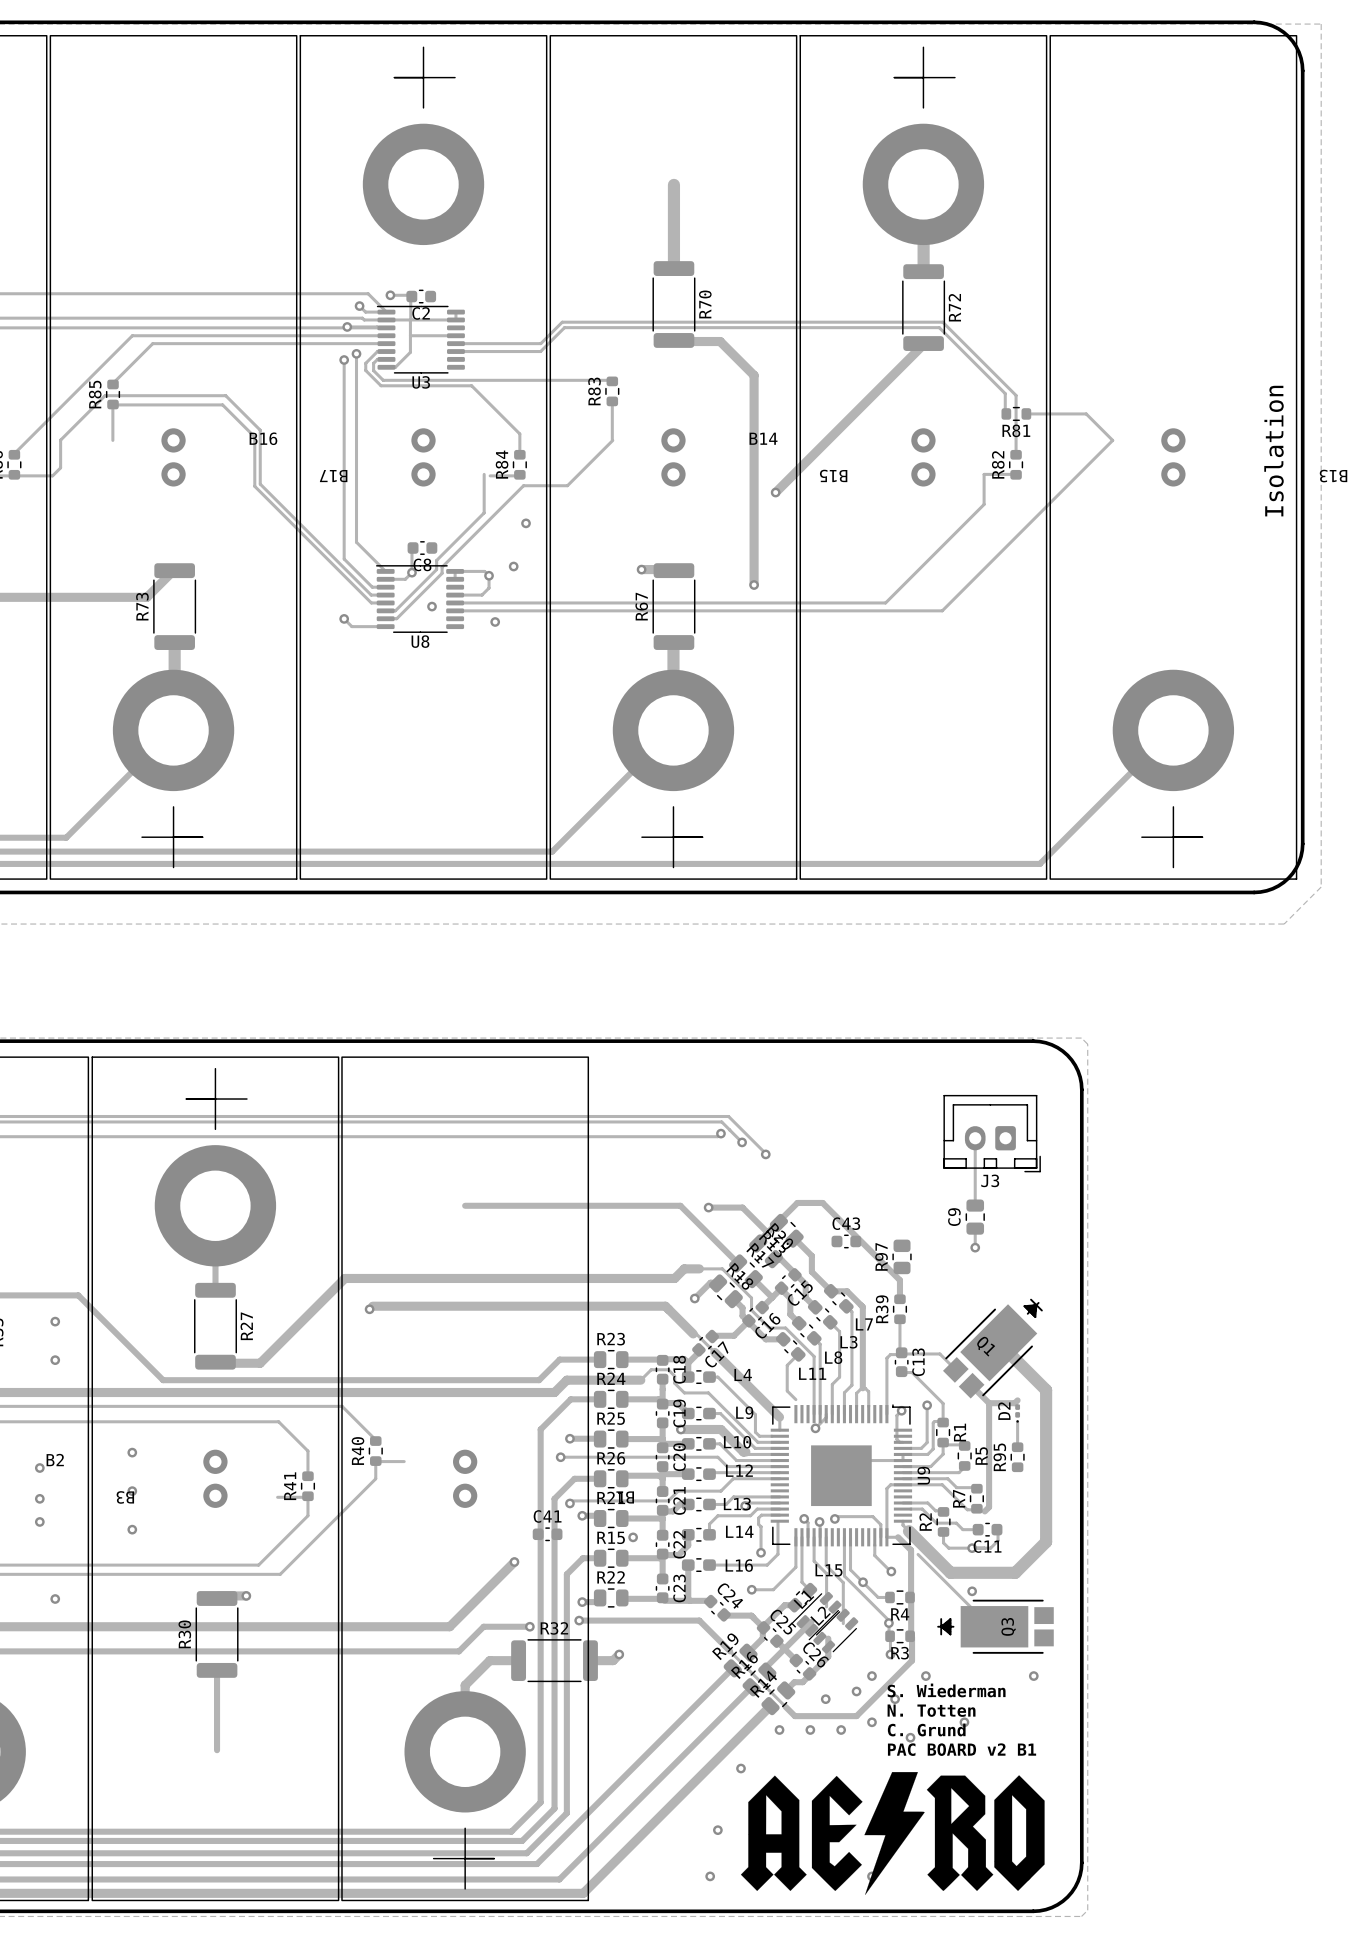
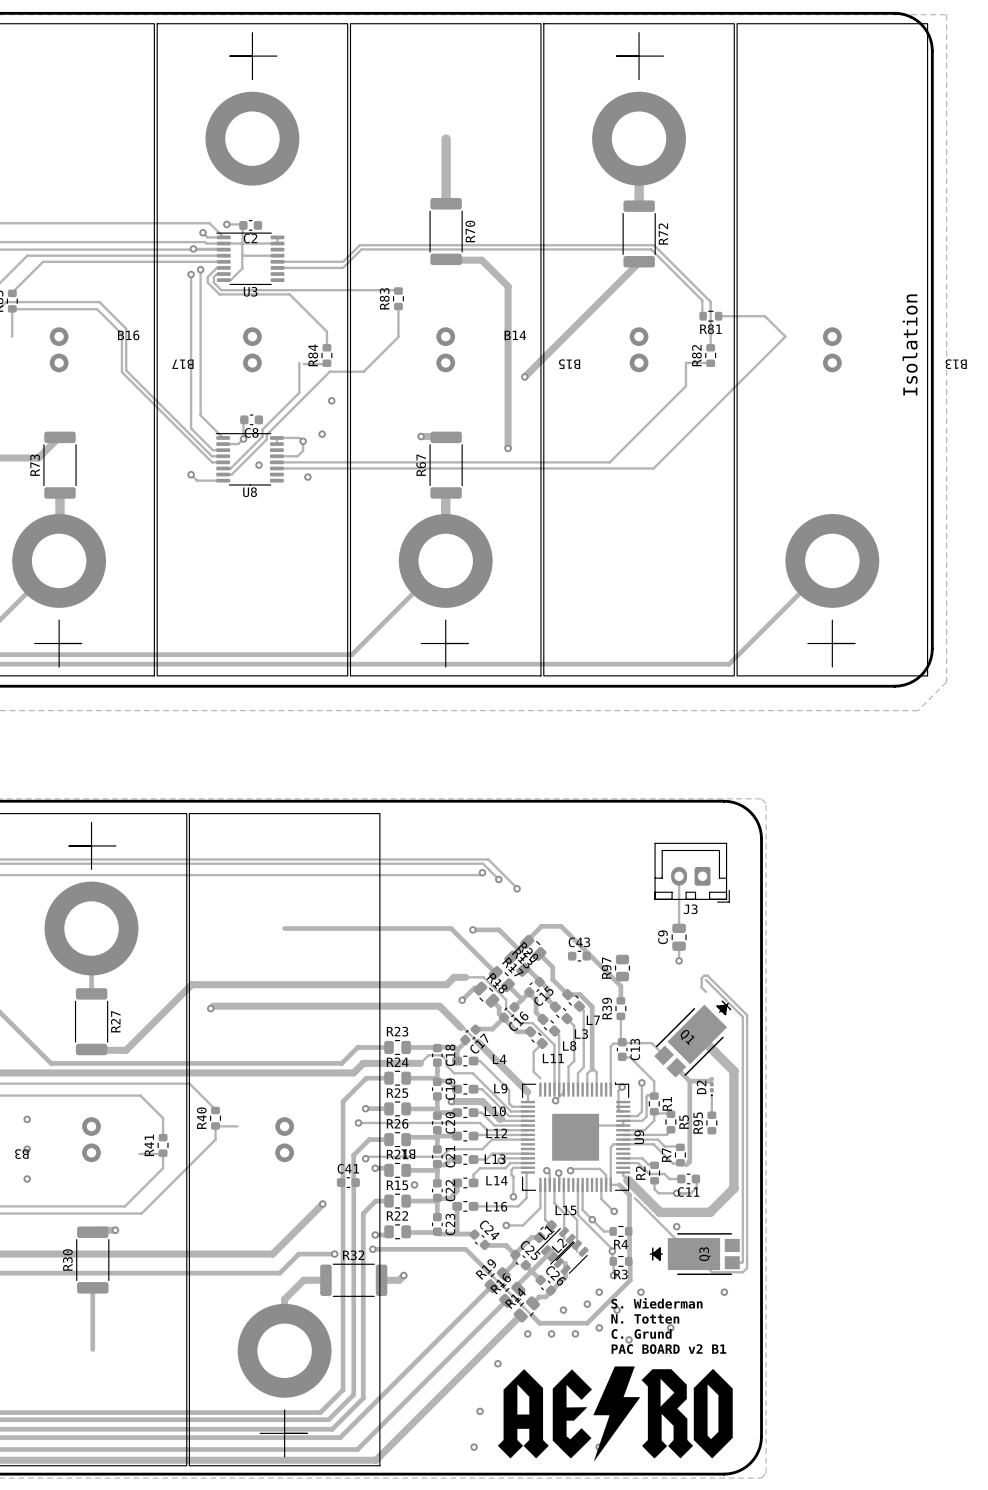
track: none -> (705, 979) (742, 1016) (742, 1262) (732, 1262)
track: none -> (705, 991) (701, 987) (701, 978) (704, 975) (707, 975) (747, 1015) (747, 1268) (742, 1272) (712, 1272) (693, 1254)

